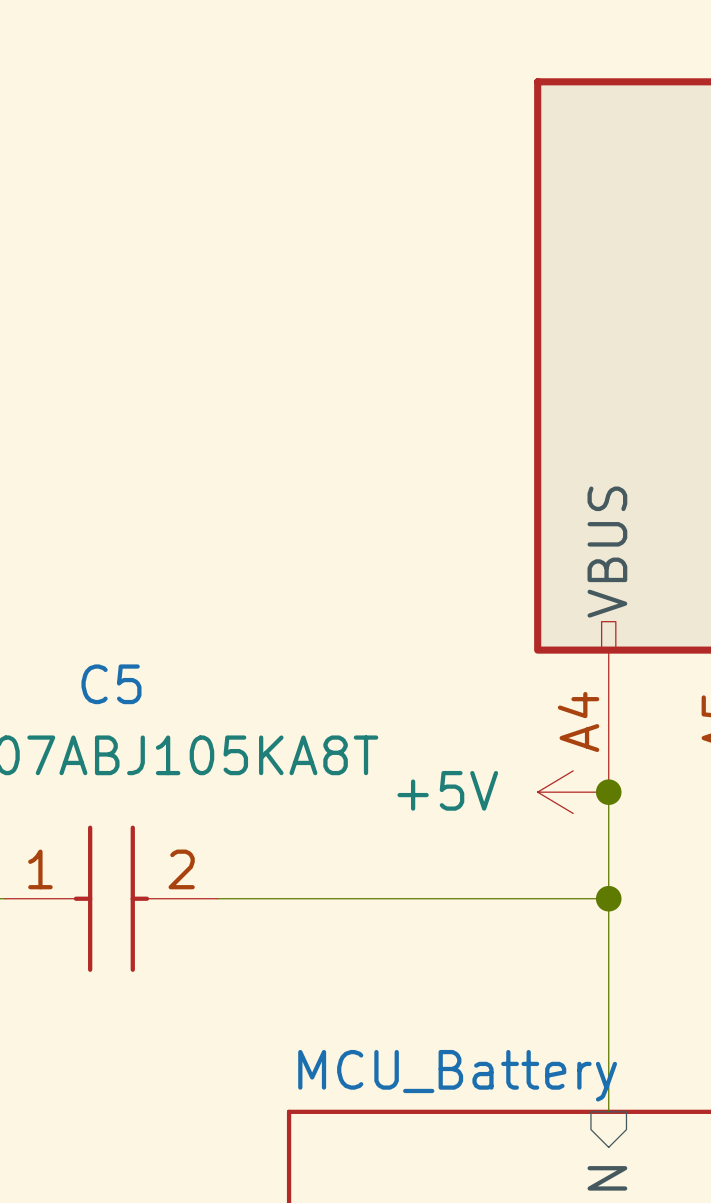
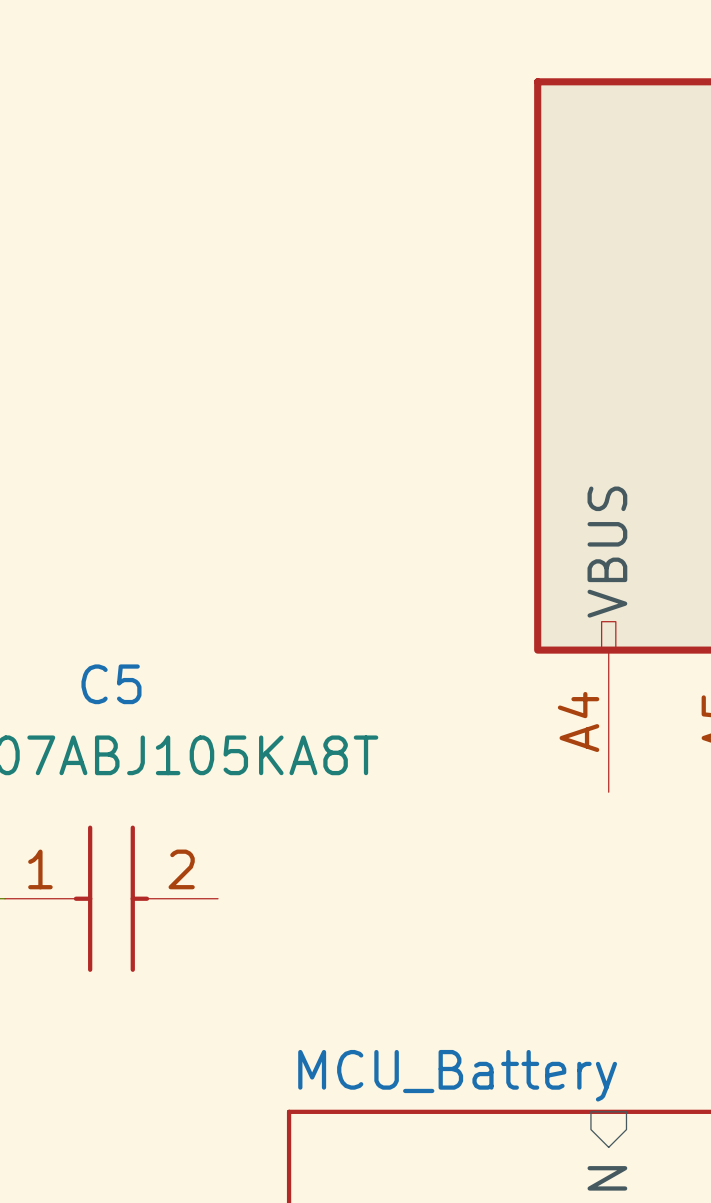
power symbol: +5V (573, 792) -> none
wire: (608, 792) (608, 1111) -> none
junction: (608, 792) -> none
wire: (218, 898) (608, 898) -> none
junction: (608, 898) -> none

